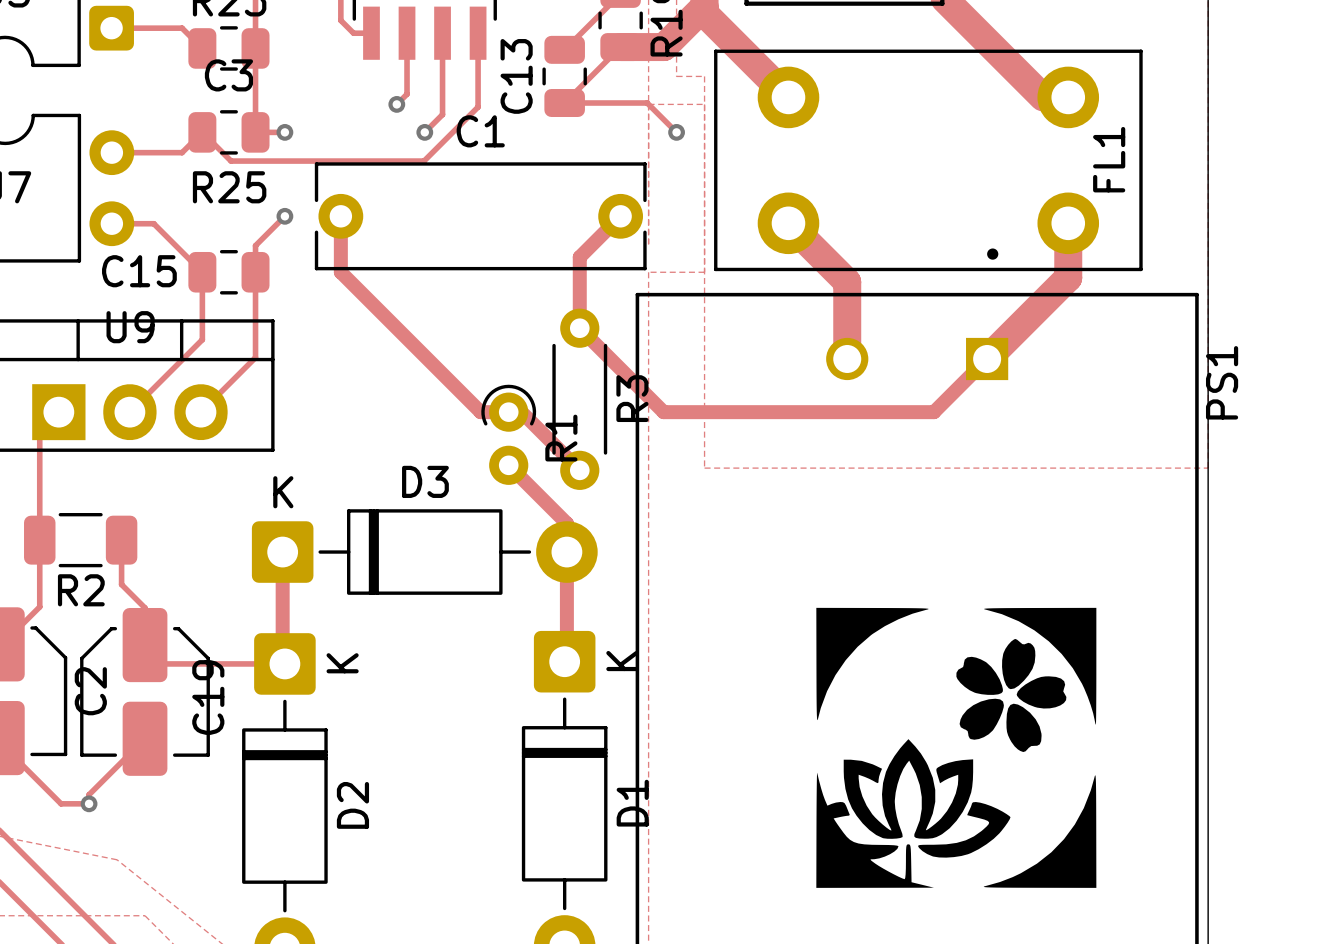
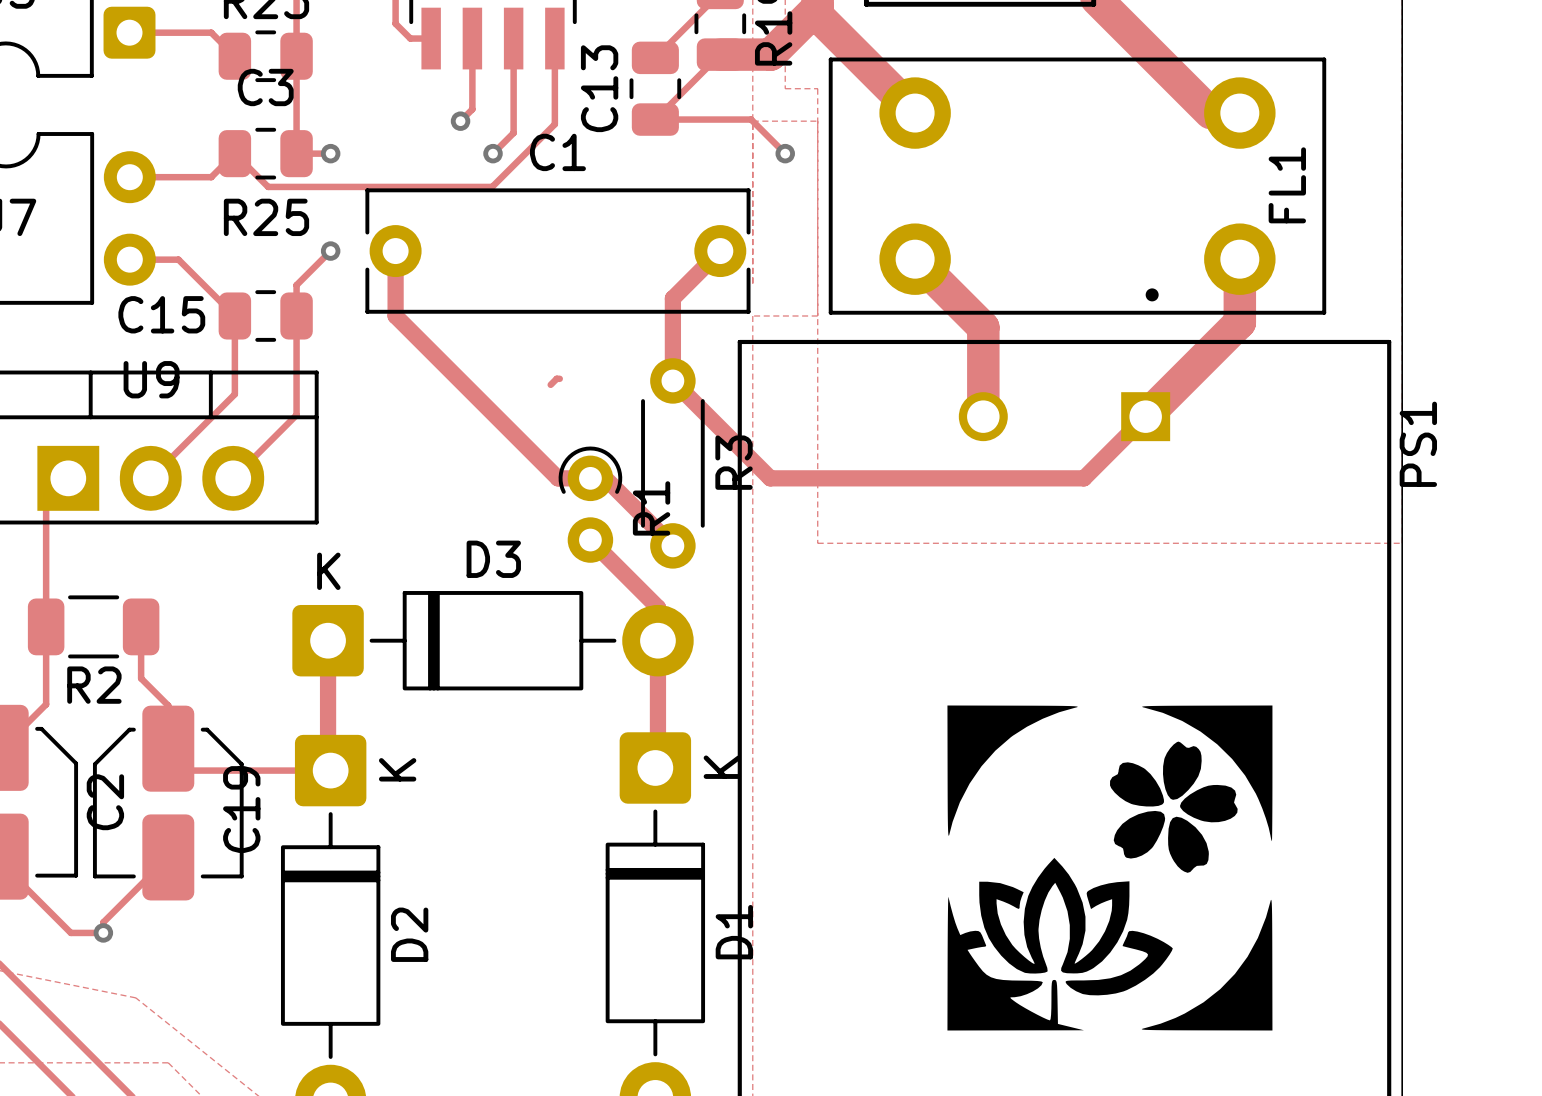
track: none -> (559, 378) (556, 378) (550, 384)

